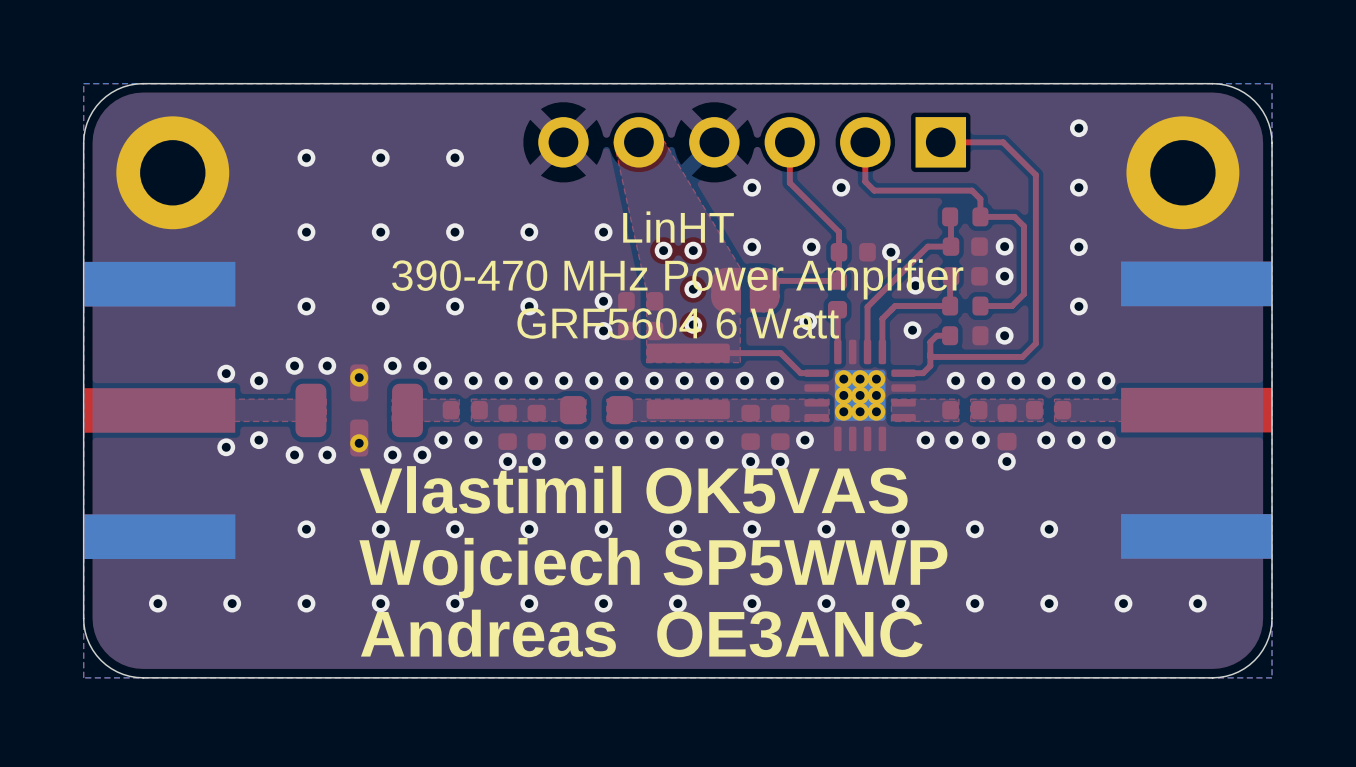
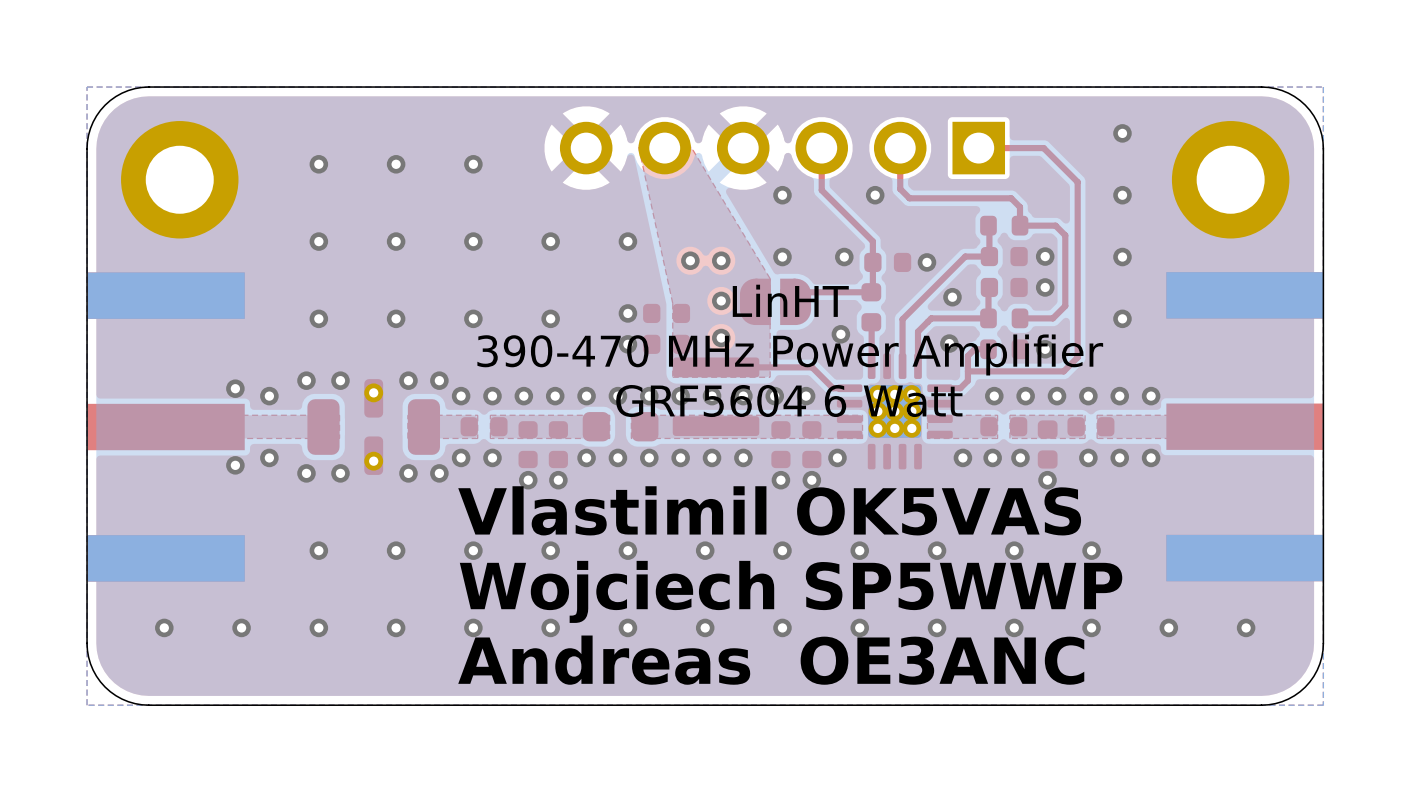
text position: LinHT (678, 227) -> LinHT (790, 300)
text position: 390-470 MHz Power Amplifier (677, 279) -> 390-470 MHz Power Amplifier (790, 354)
text position: GRF5604 6 Watt (678, 323) -> GRF5604 6 Watt (789, 401)
text position: Vlastimil OK5VAS (633, 489) -> Vlastimil OK5VAS (769, 510)
text position: Wojciech SP5WWP (653, 568) -> Wojciech SP5WWP (791, 591)
text position: Andreas OE3ANC (641, 633) -> Andreas OE3ANC (771, 660)

